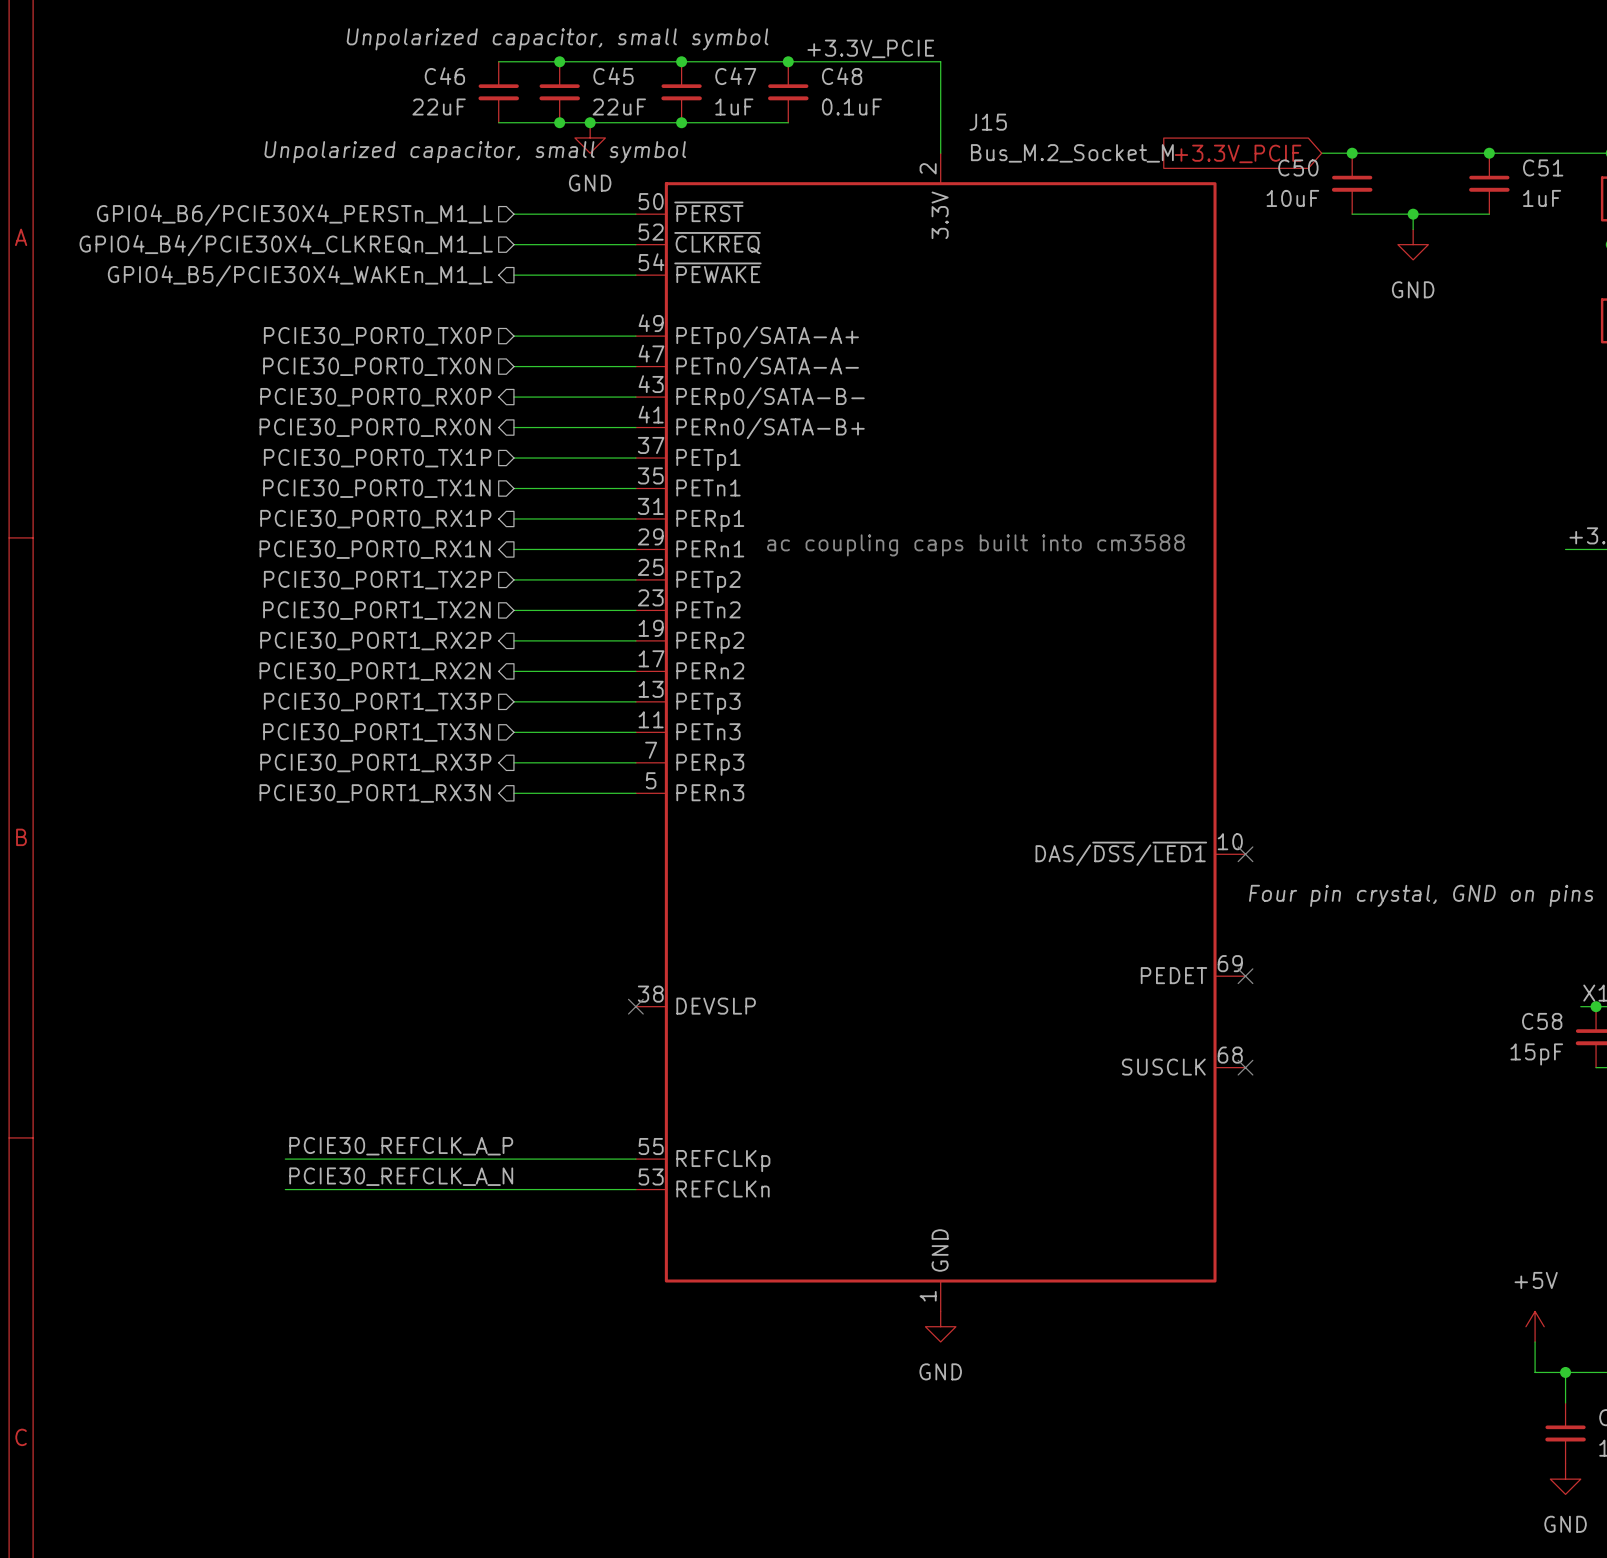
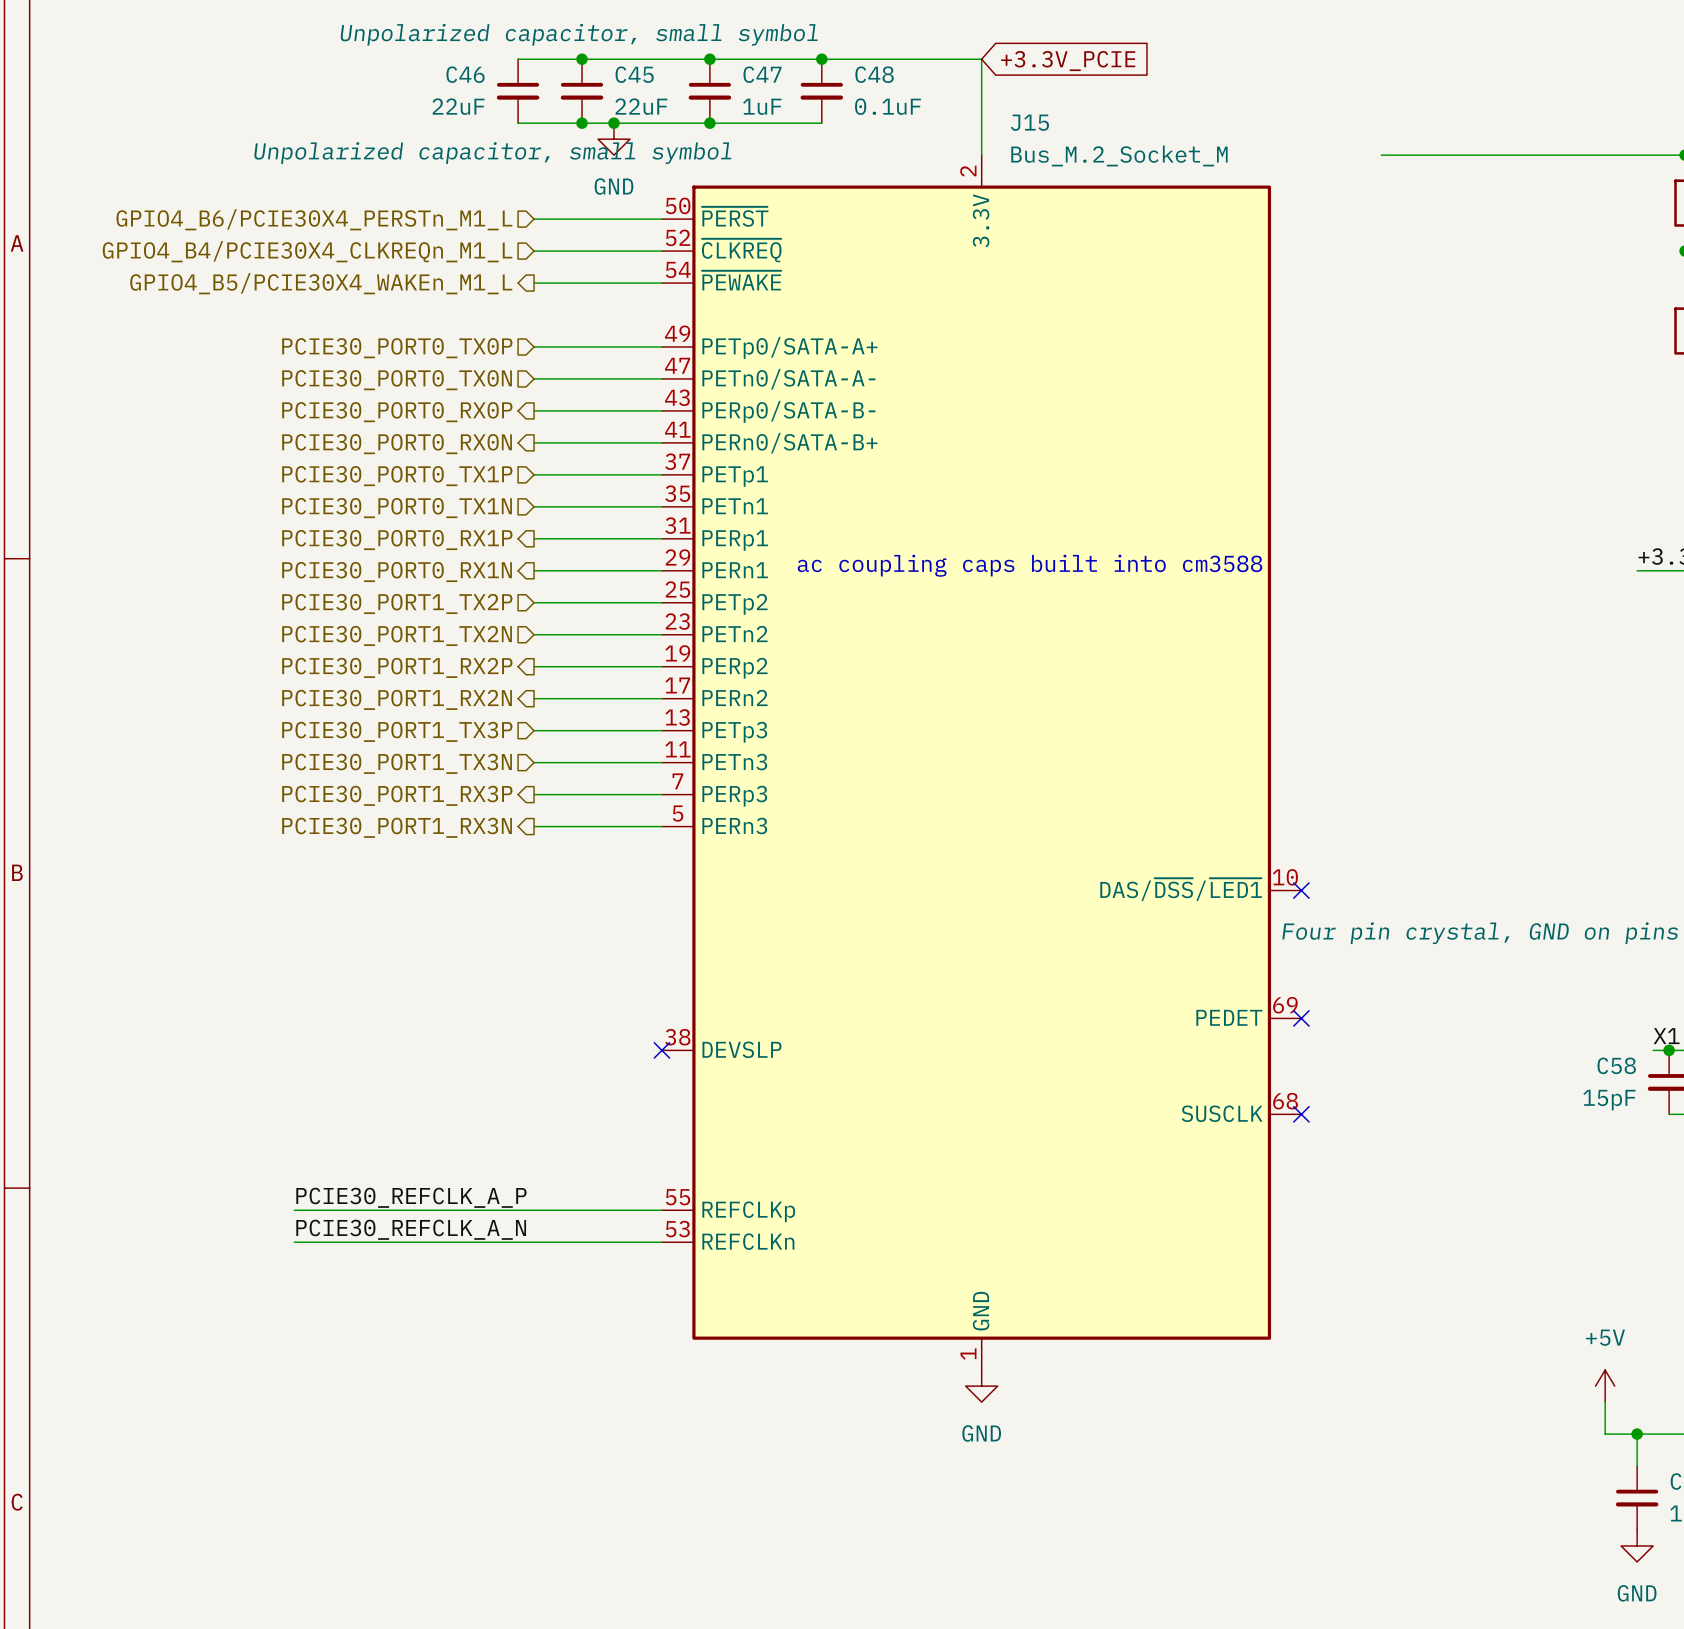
label: +3.3V_PCIE (870, 48) -> none
global label: none -> +3.3V_PCIE (1068, 61)
global label: +3.3V_PCIE (1238, 153) -> none
junction: (1352, 153) -> none
junction: (1489, 153) -> none
C50: 10uF (1352, 183) -> none
C51: 1uF (1489, 183) -> none
wire: (1352, 214) (1489, 214) -> none
wire: (1413, 214) (1413, 229) -> none
junction: (1413, 214) -> none
power symbol: GND (1413, 244) -> none

